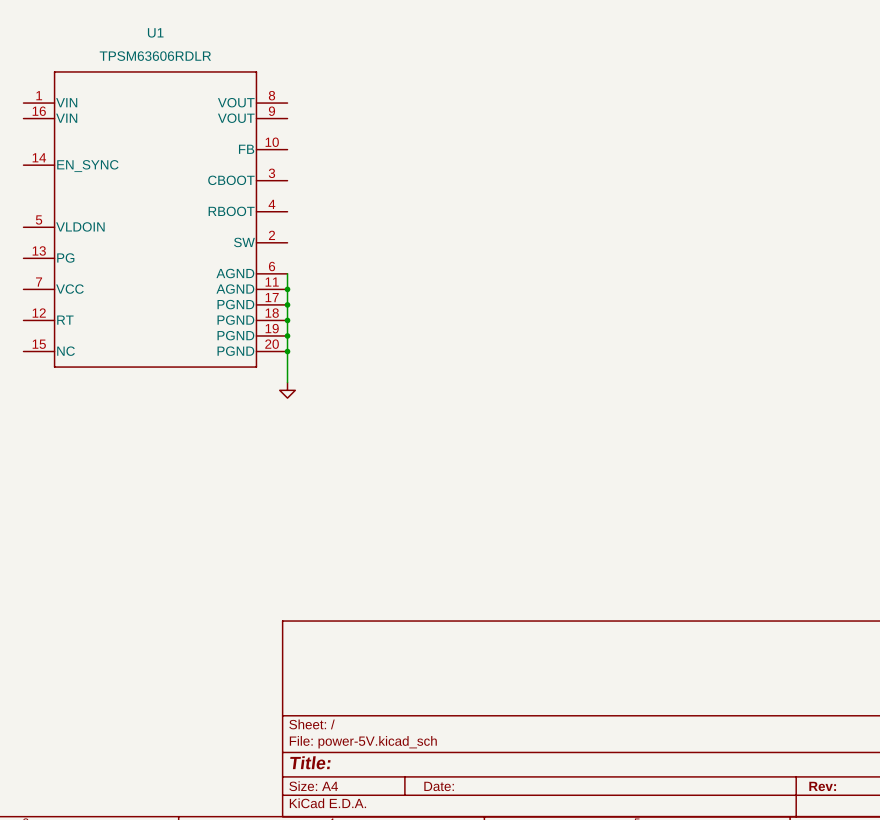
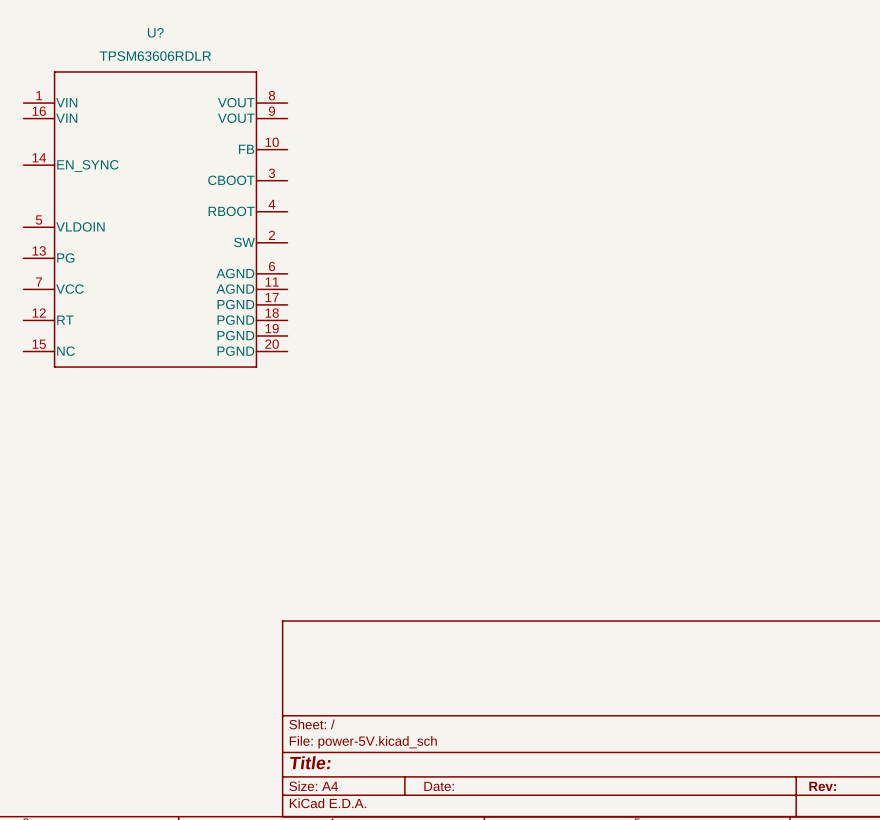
U1 name: U1 (155, 32) -> U? (155, 32)
wire: (287, 273) (287, 382) -> none
junction: (287, 289) -> none
junction: (287, 304) -> none
junction: (287, 320) -> none
junction: (287, 335) -> none
junction: (287, 351) -> none
power symbol: (287, 390) -> none

